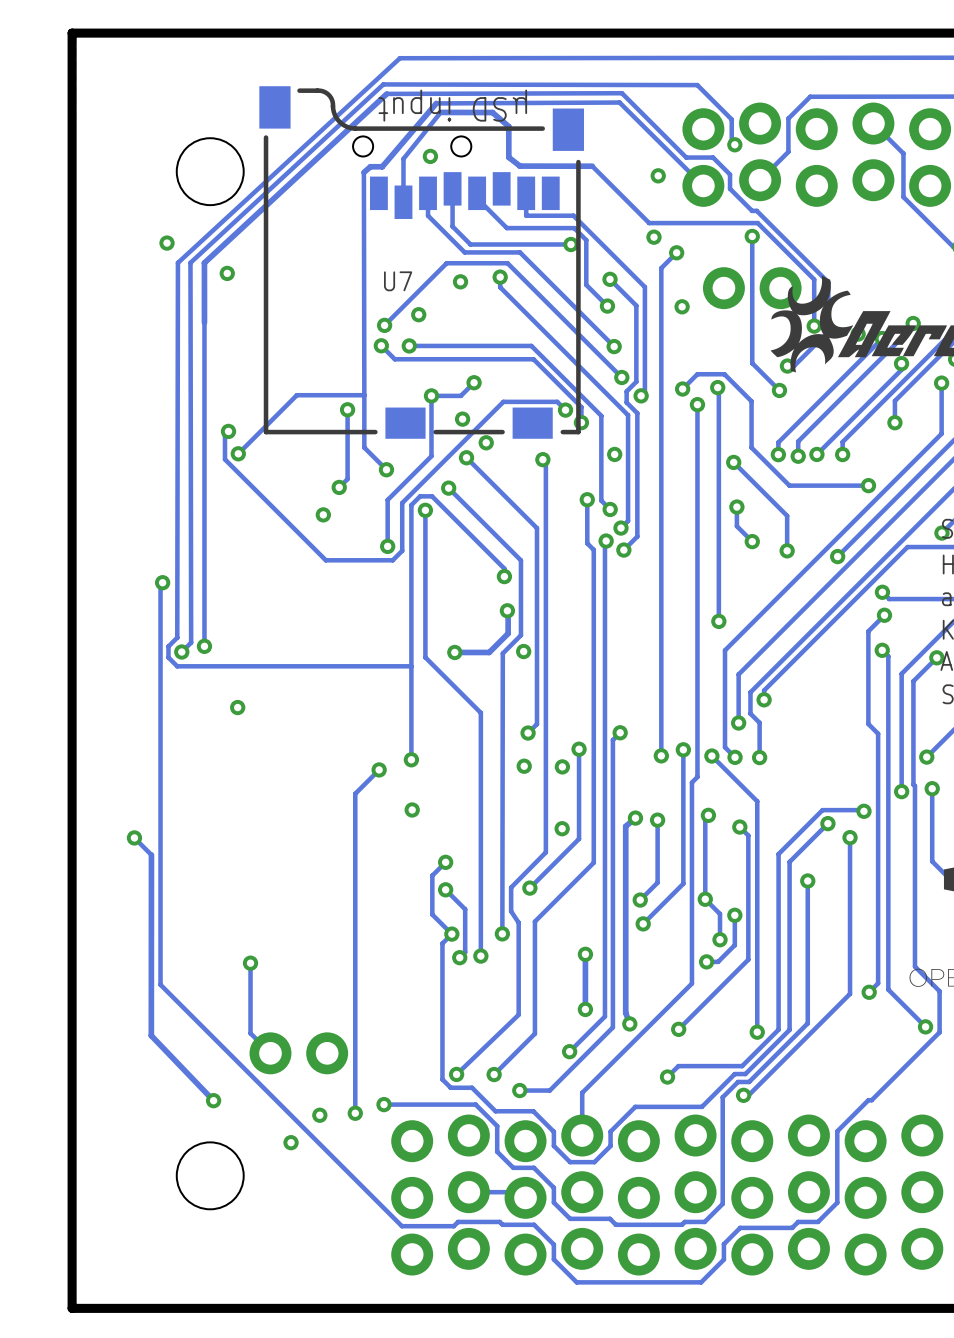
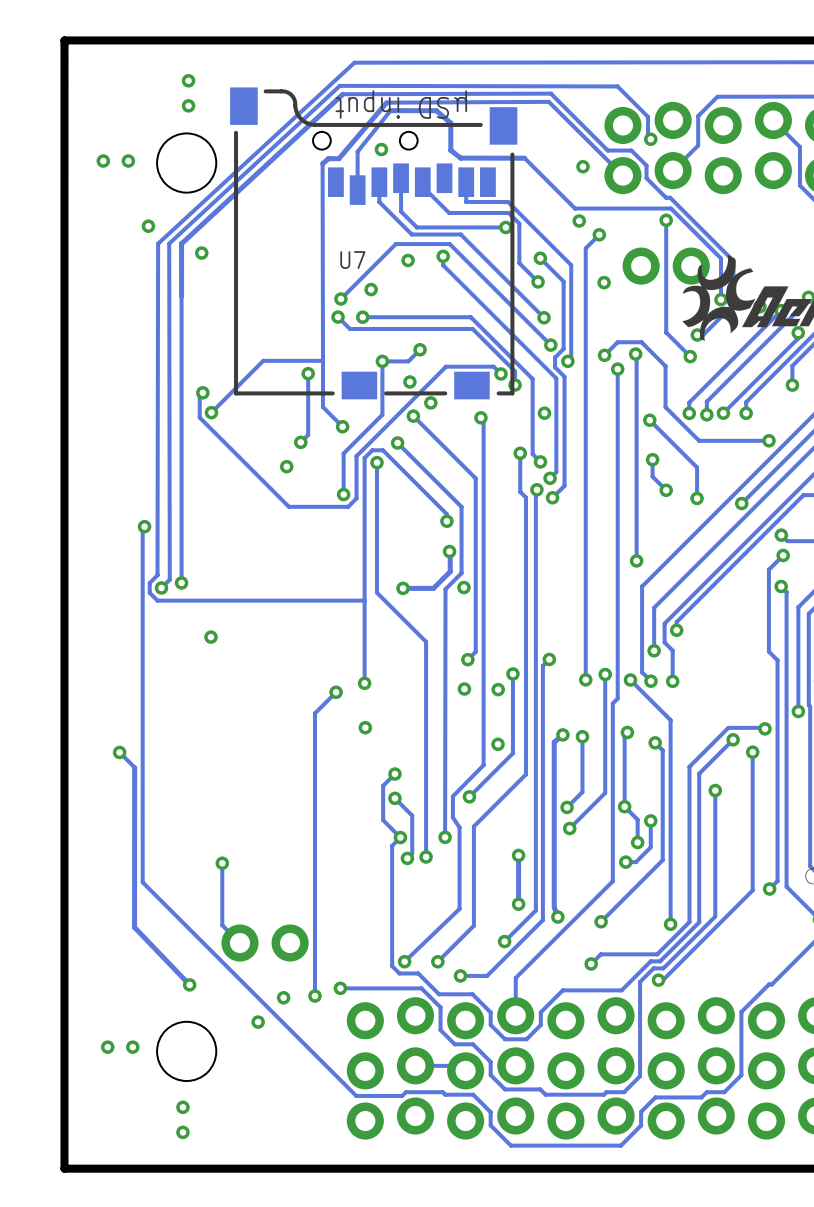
via: none -> (188, 80)
via: none -> (188, 105)
via: none -> (103, 161)
via: none -> (128, 161)
via: none -> (107, 1047)
via: none -> (132, 1047)
via: none -> (182, 1107)
via: none -> (182, 1132)

